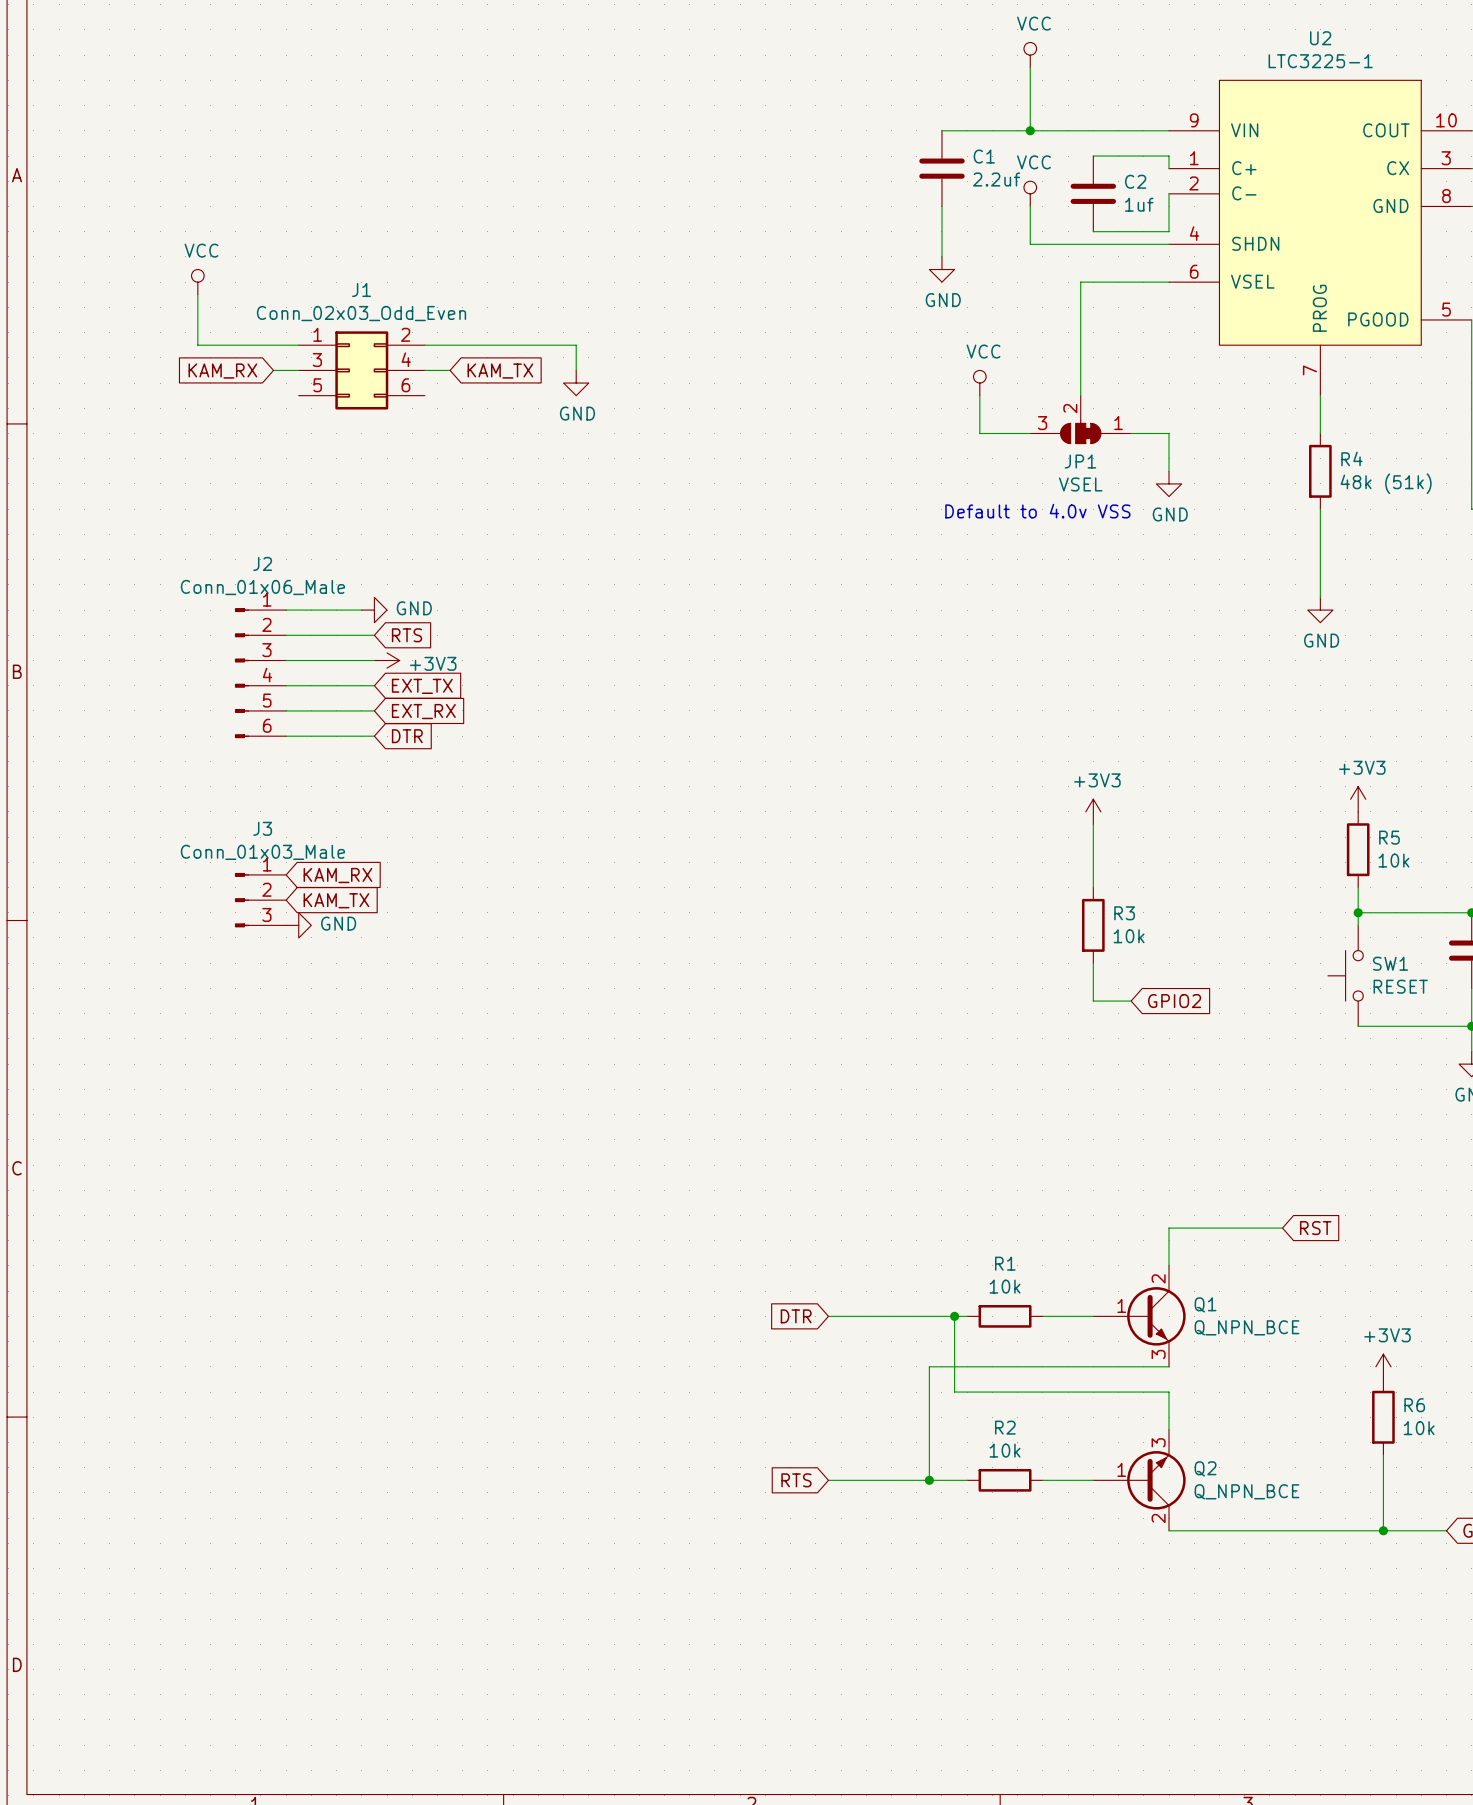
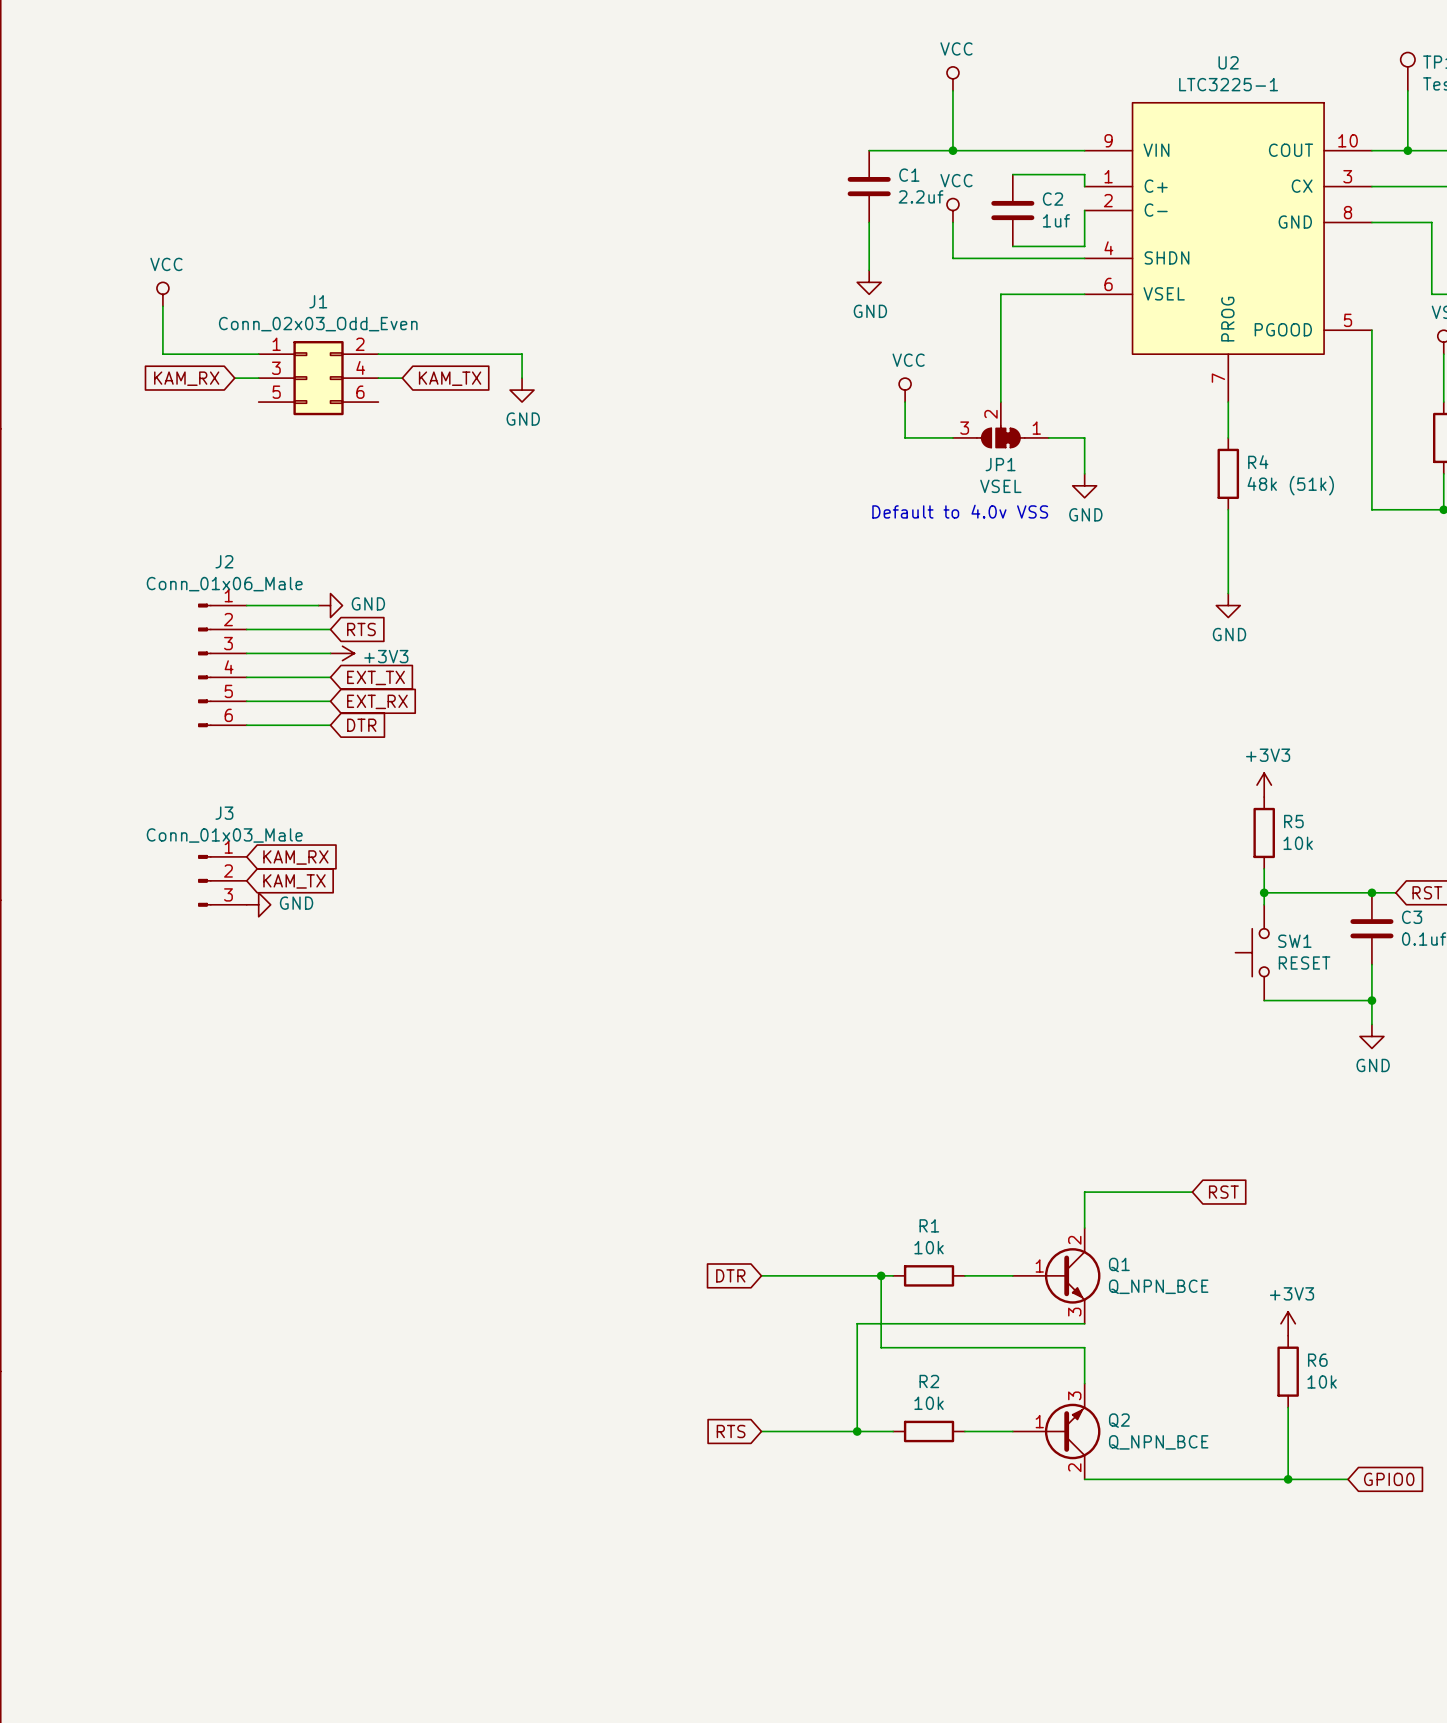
power symbol: +3V3 (1093, 811) -> none
wire: (1093, 824) (1093, 887) -> none
R3: 10k (1093, 925) -> none
wire: (1093, 963) (1093, 1001) (1131, 1001) -> none
global label: GPIO2 (1174, 1001) -> none

